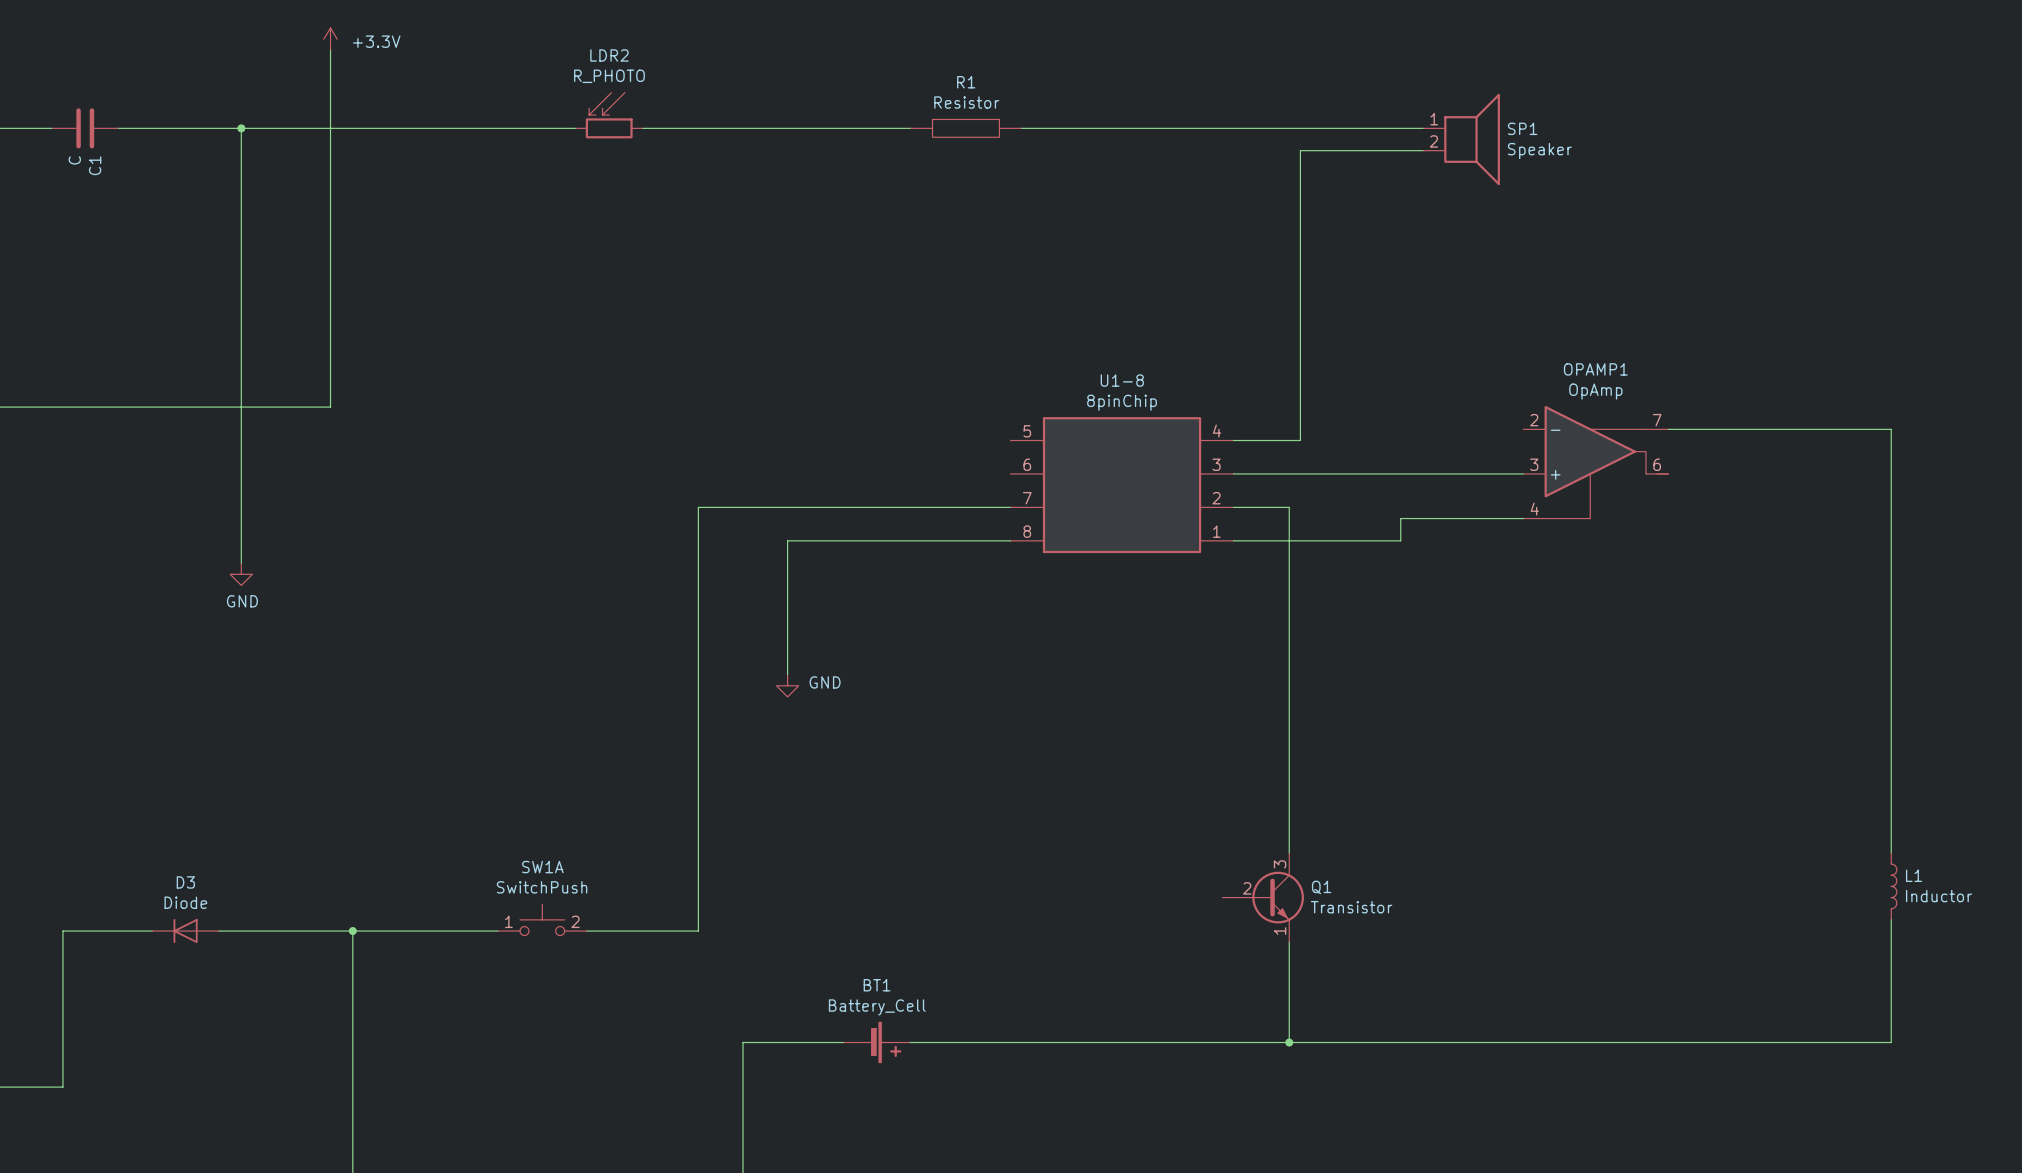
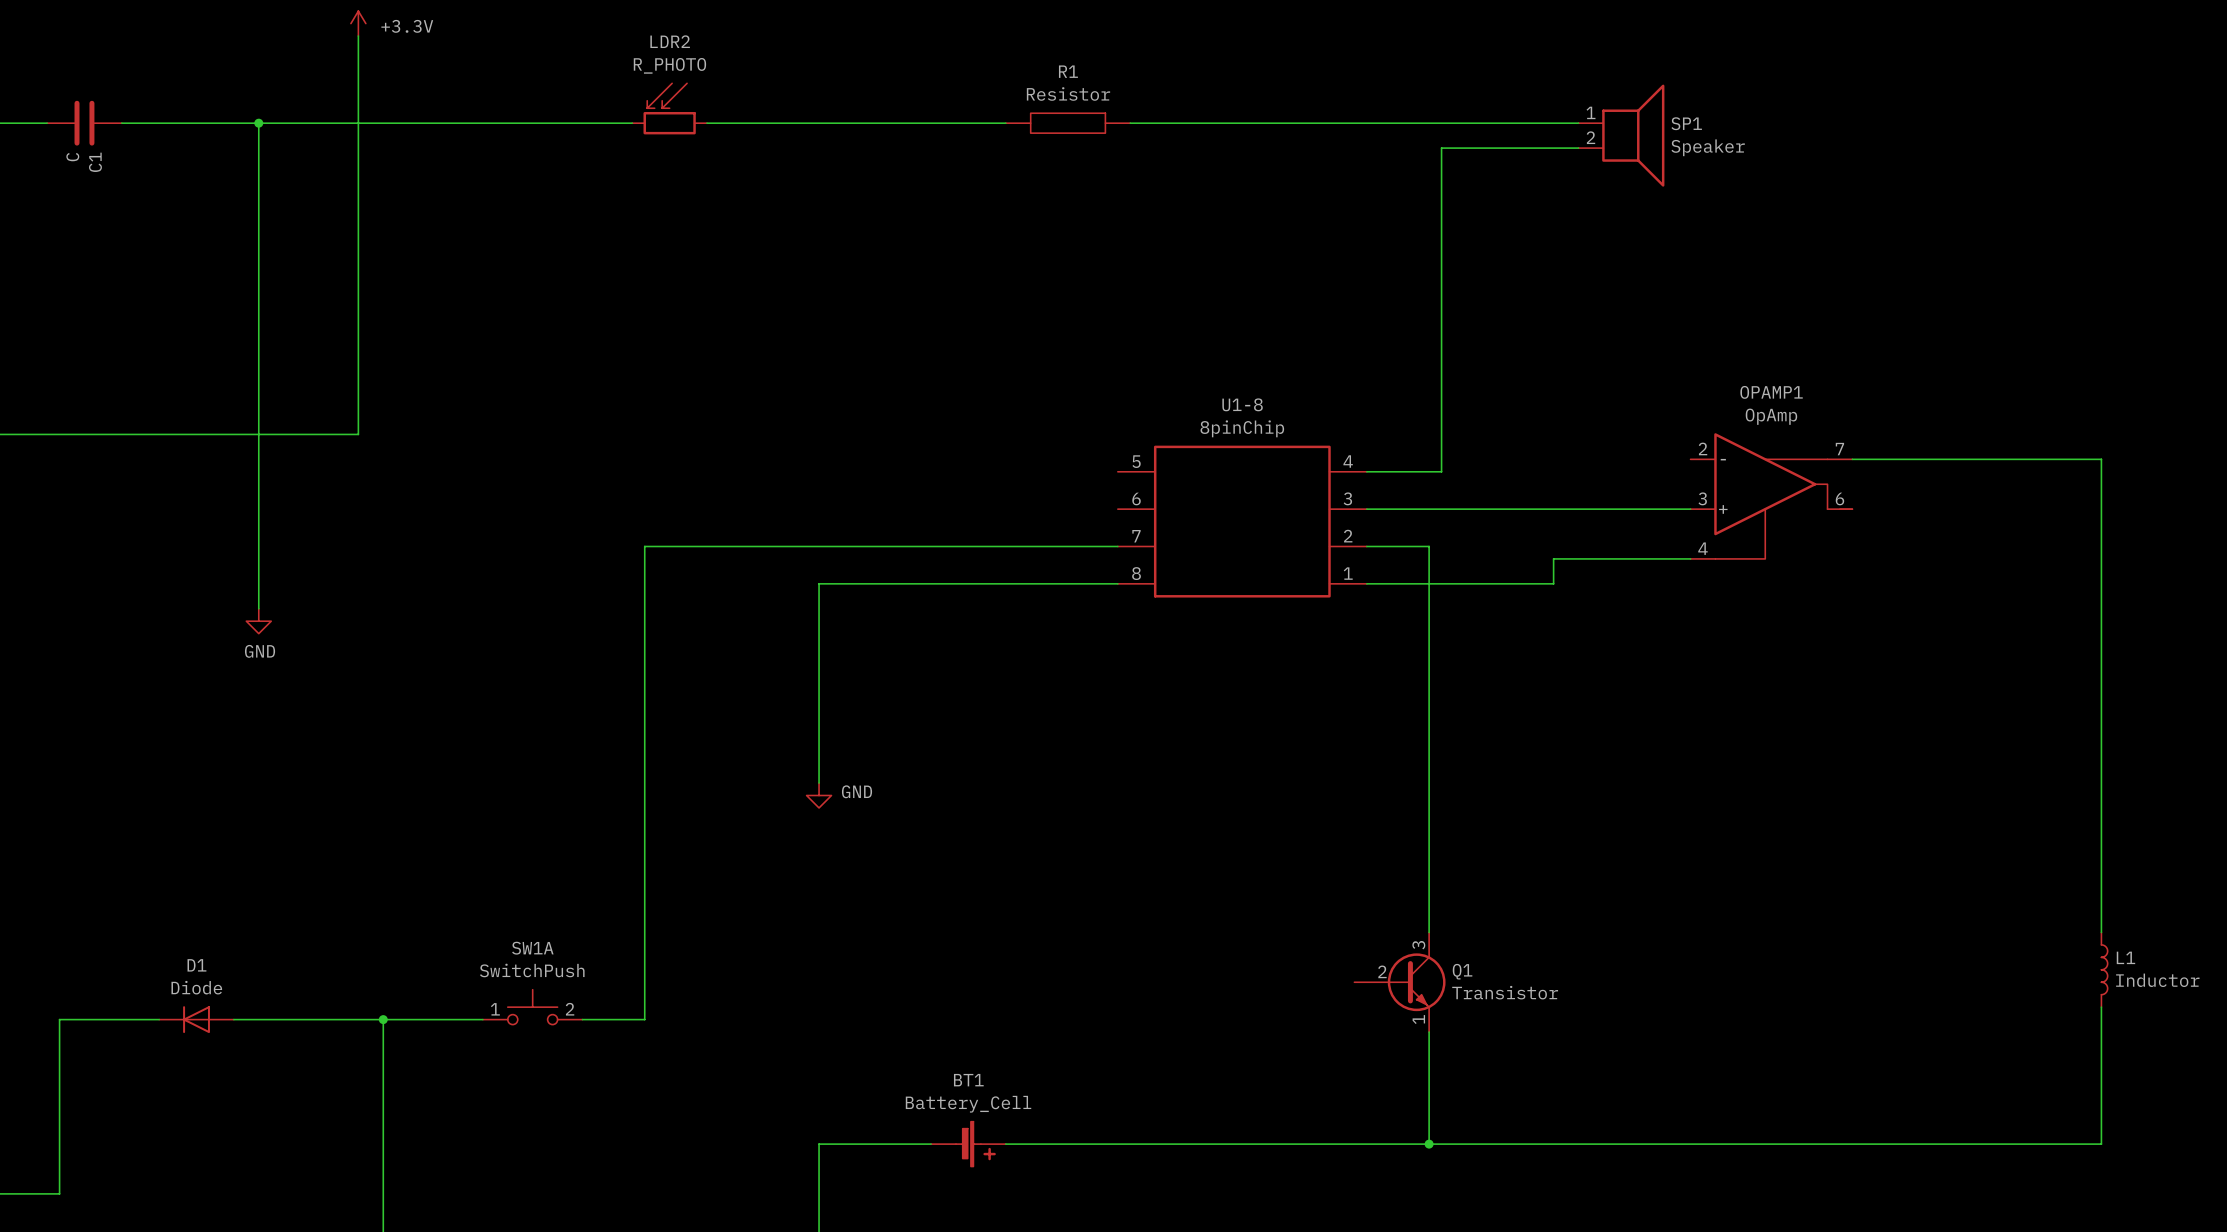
wire: (698, 507) (698, 931) (586, 931) -> (769, 546) (644, 546) (644, 1019) (582, 1019)
wire: (787, 540) (787, 674) -> (868, 583) (819, 583) (819, 783)
power symbol position: GND (787, 685) -> GND (819, 795)
D3 name: D3 (185, 882) -> D1 (196, 965)
SW1A position: (542, 919) -> (532, 1007)
wire: (442, 931) (497, 931) -> none

